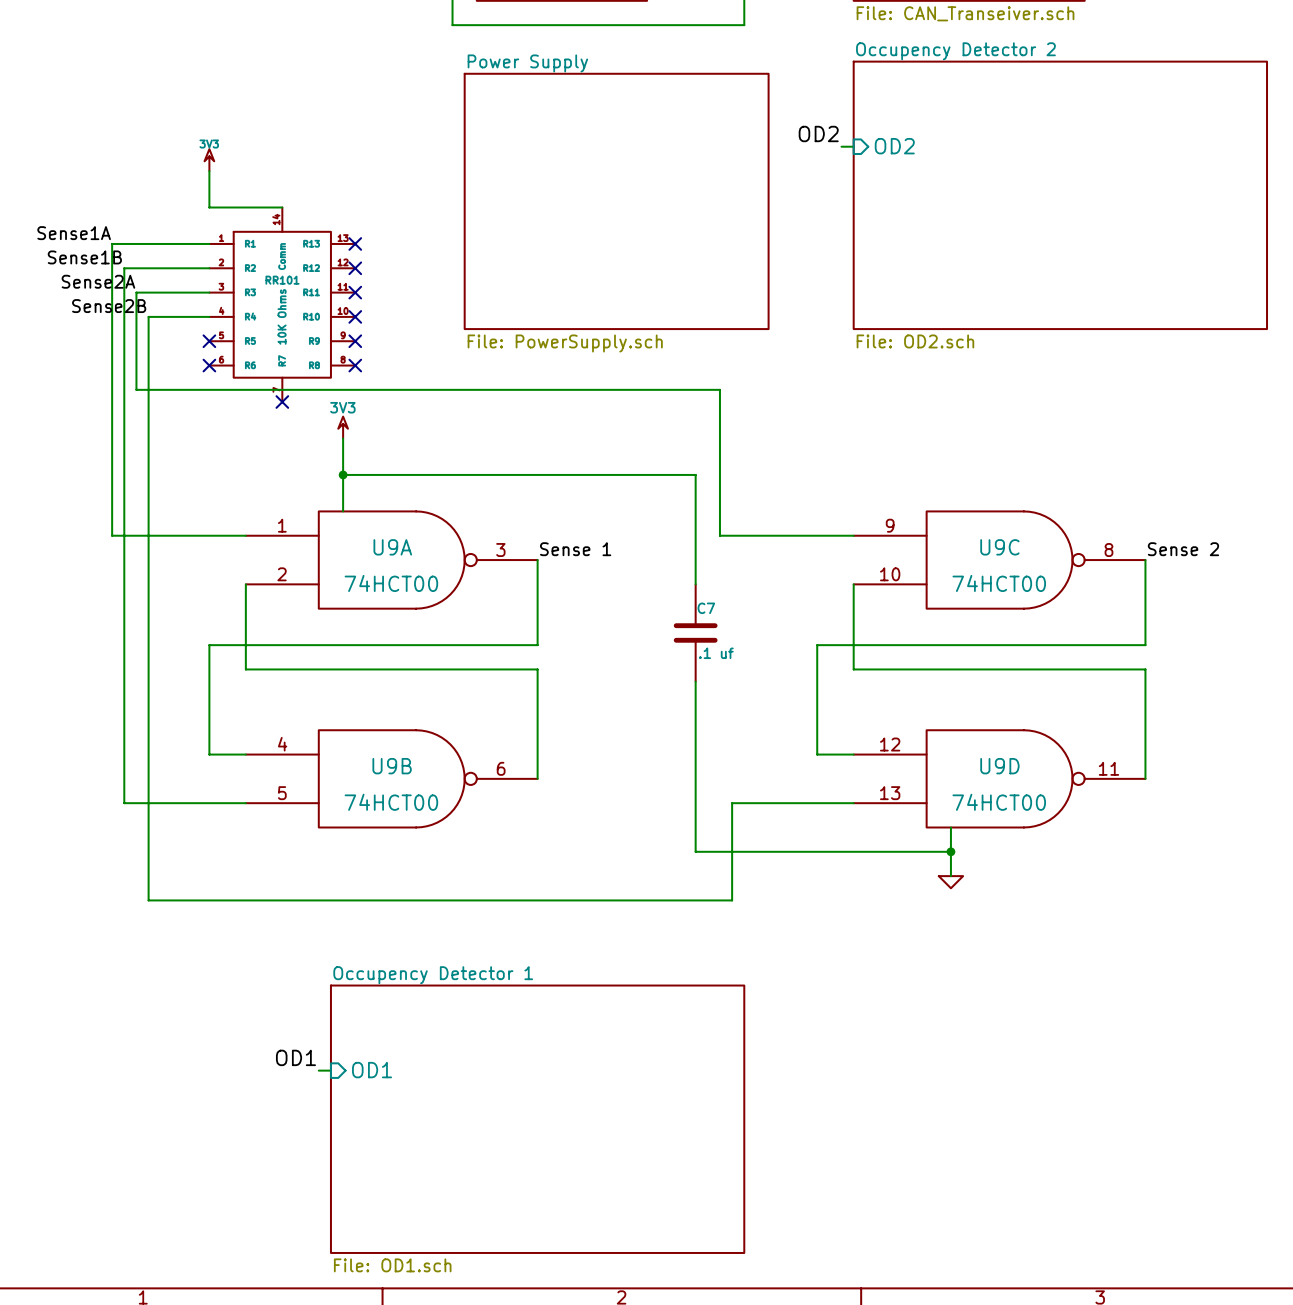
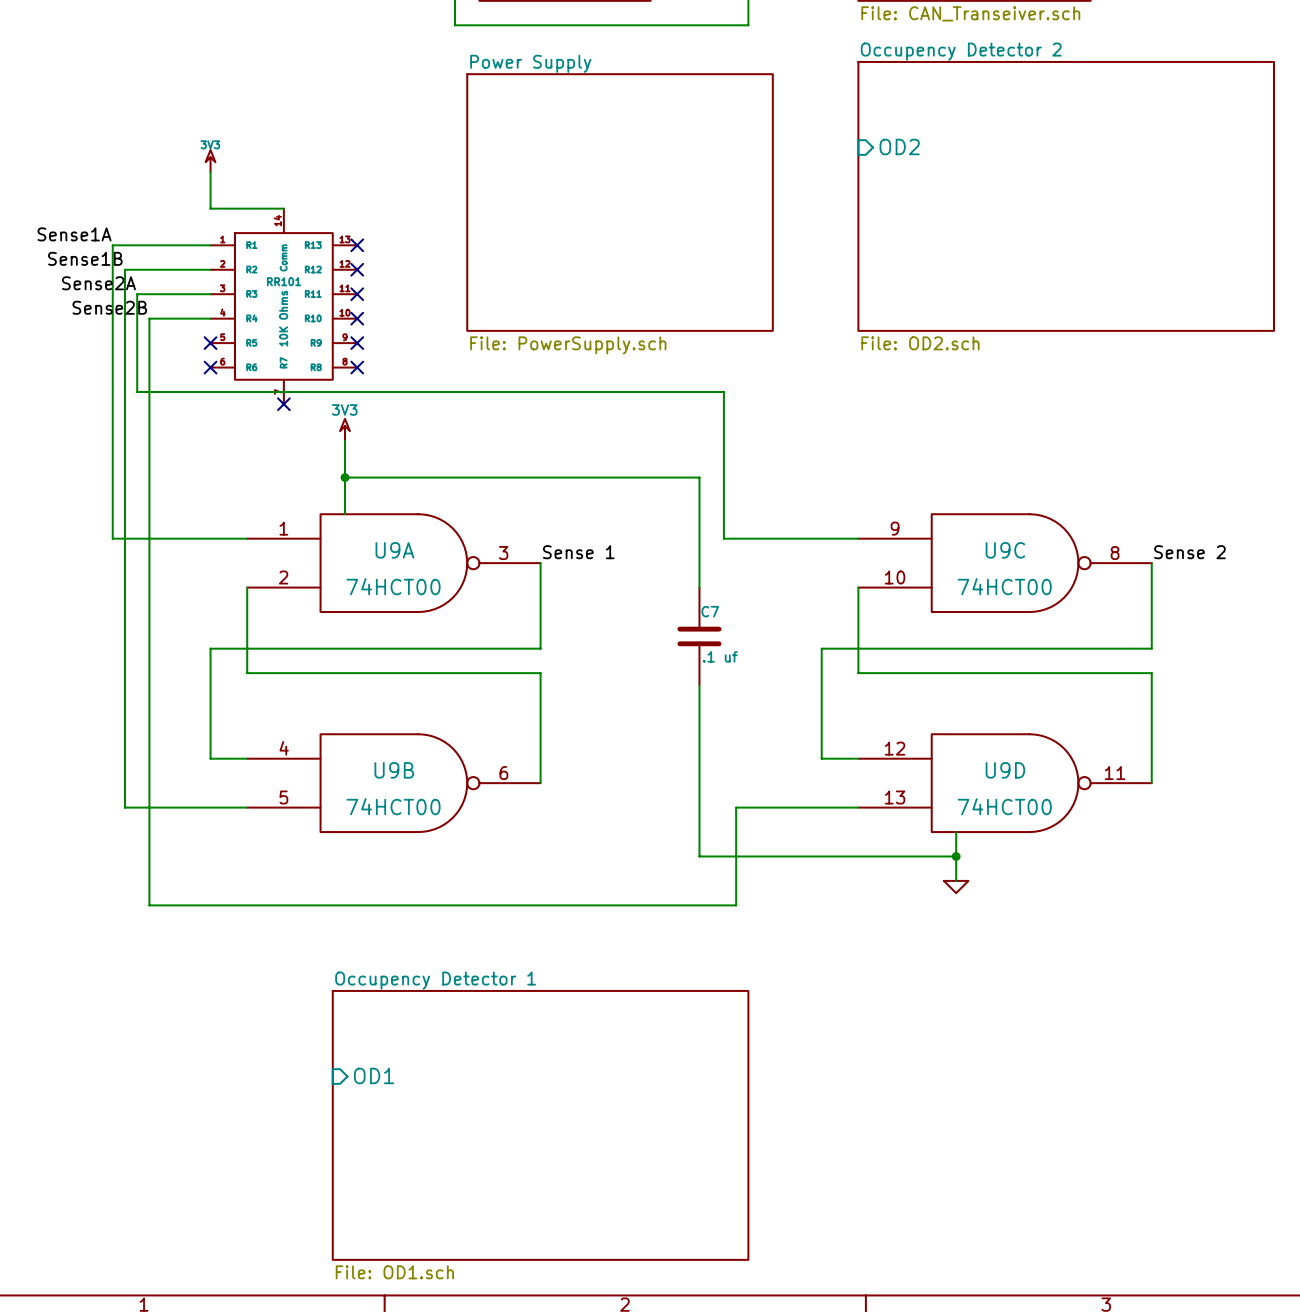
label: OD2 (818, 133) -> none
wire: (841, 146) (853, 146) -> none
label: OD1 (295, 1057) -> none
wire: (318, 1070) (330, 1070) -> none

